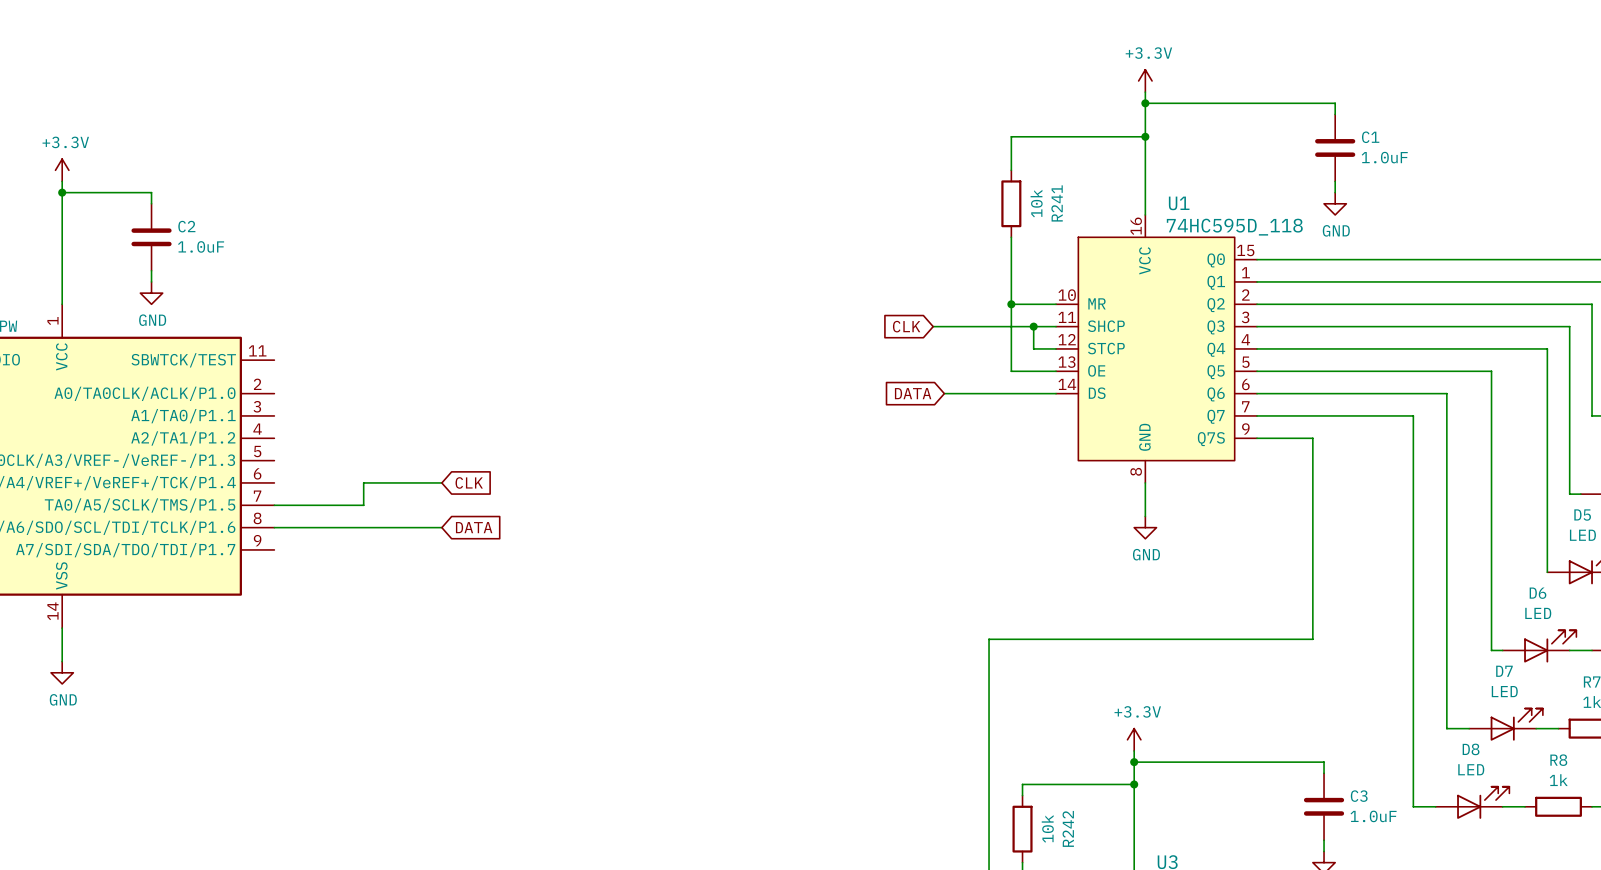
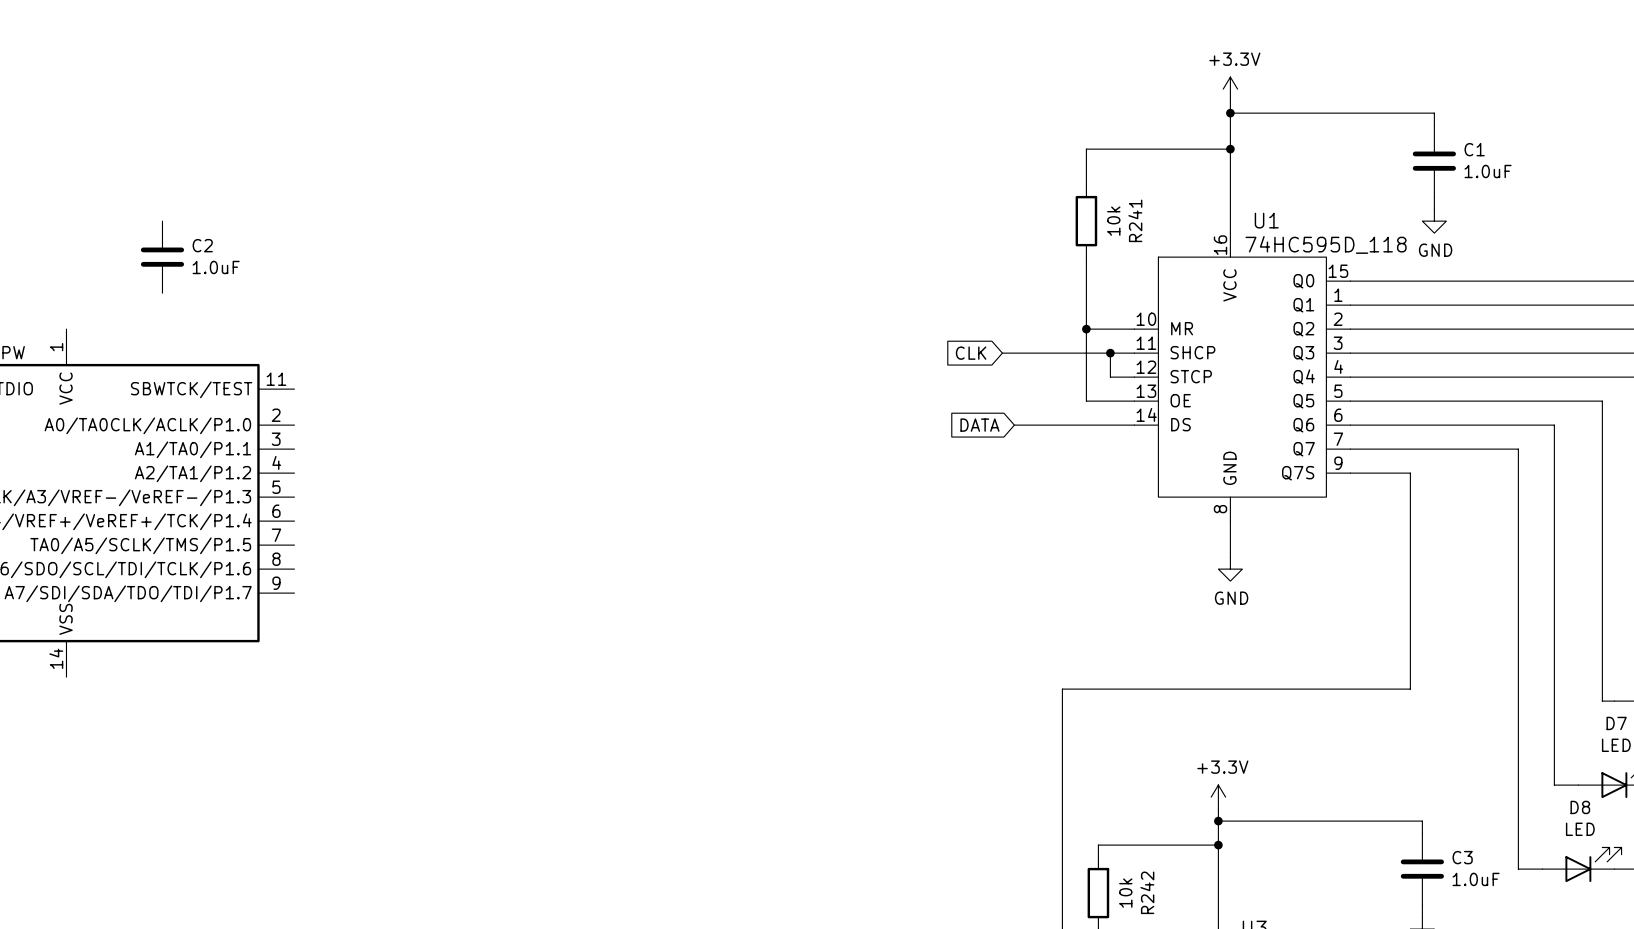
power symbol: +3.3V (62, 170) -> none
wire: (62, 181) (62, 304) -> none
wire: (62, 192) (151, 192) (151, 203) -> none
junction: (62, 192) -> none
wire: (151, 270) (151, 281) -> none
power symbol: GND (151, 293) -> none
wire: (441, 482) (363, 482) (363, 505) (274, 505) -> none
global label: CLK (469, 482) -> none
wire: (274, 527) (441, 527) -> none
global label: DATA (474, 527) -> none
wire: (62, 628) (62, 661) -> none
power symbol: GND (62, 672) -> none

